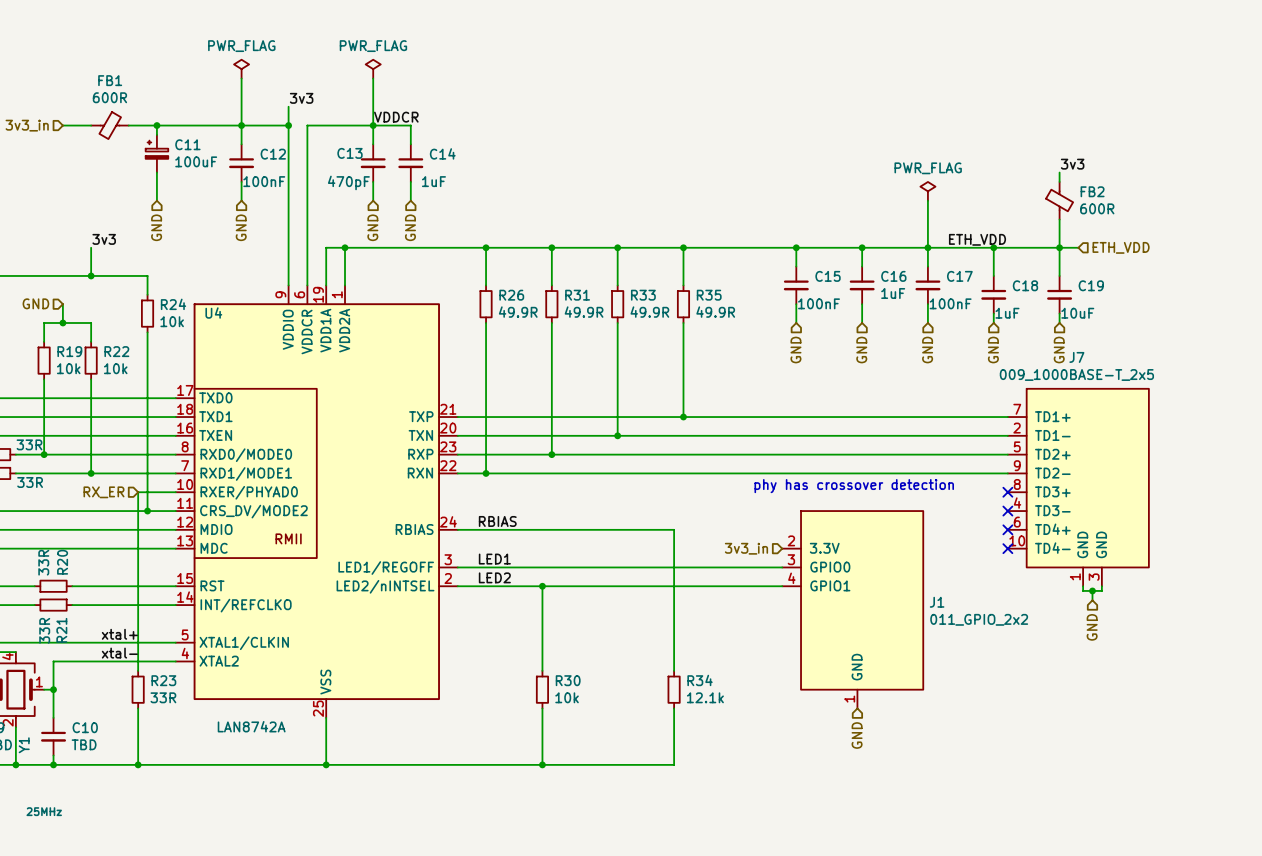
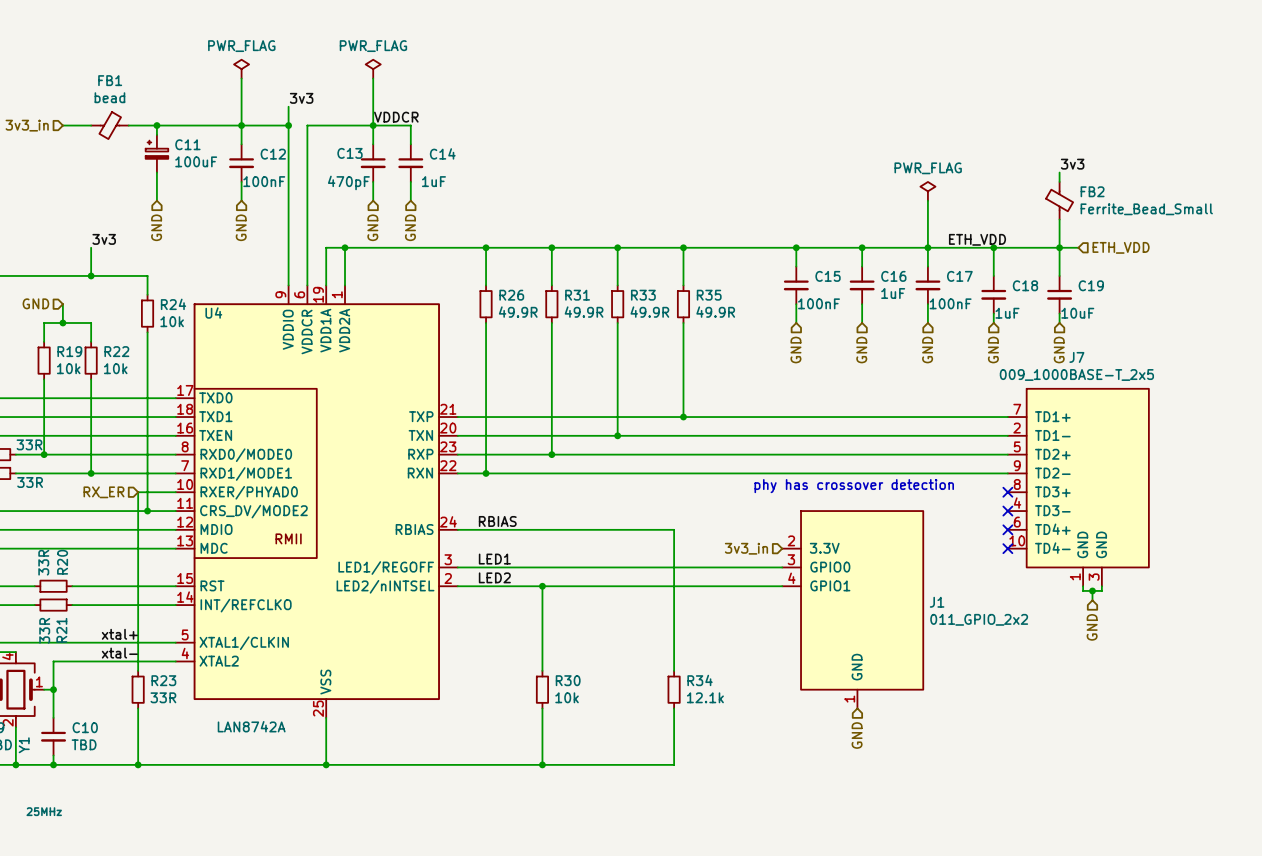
FB1 value: 600R (109, 97) -> bead (109, 97)
FB2 value: 600R (1097, 208) -> Ferrite_Bead_Small (1146, 209)

